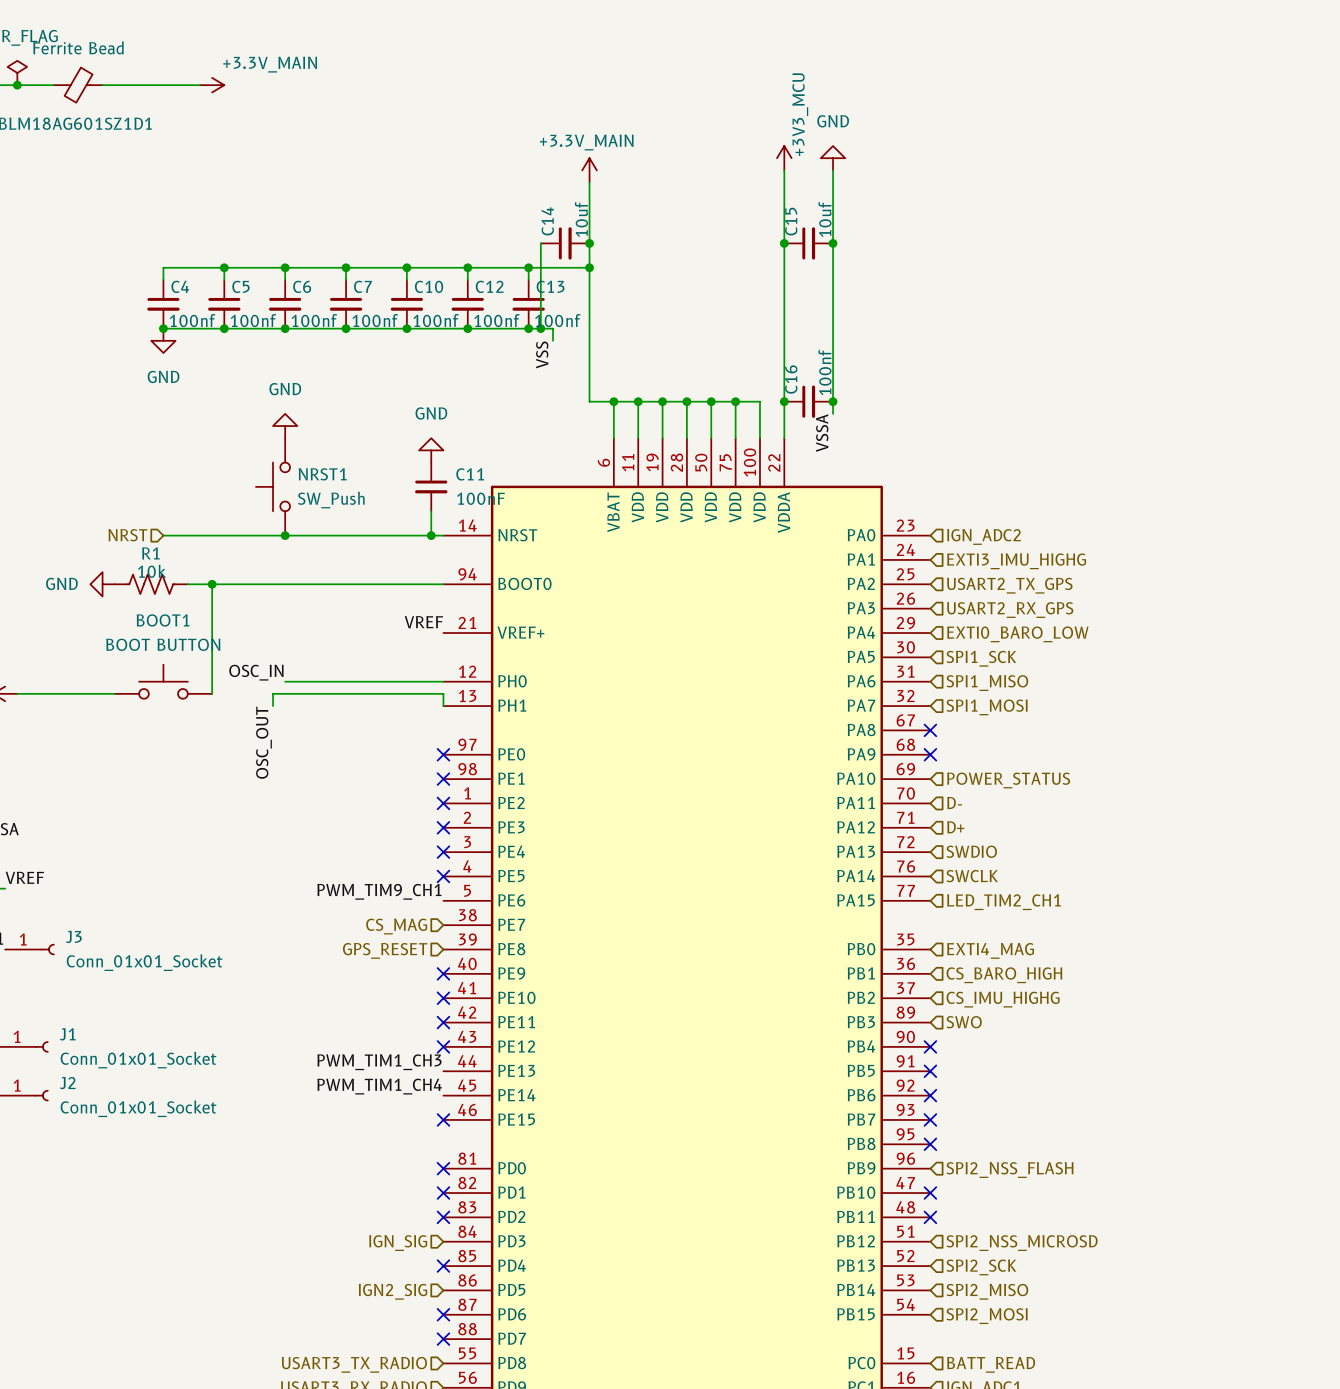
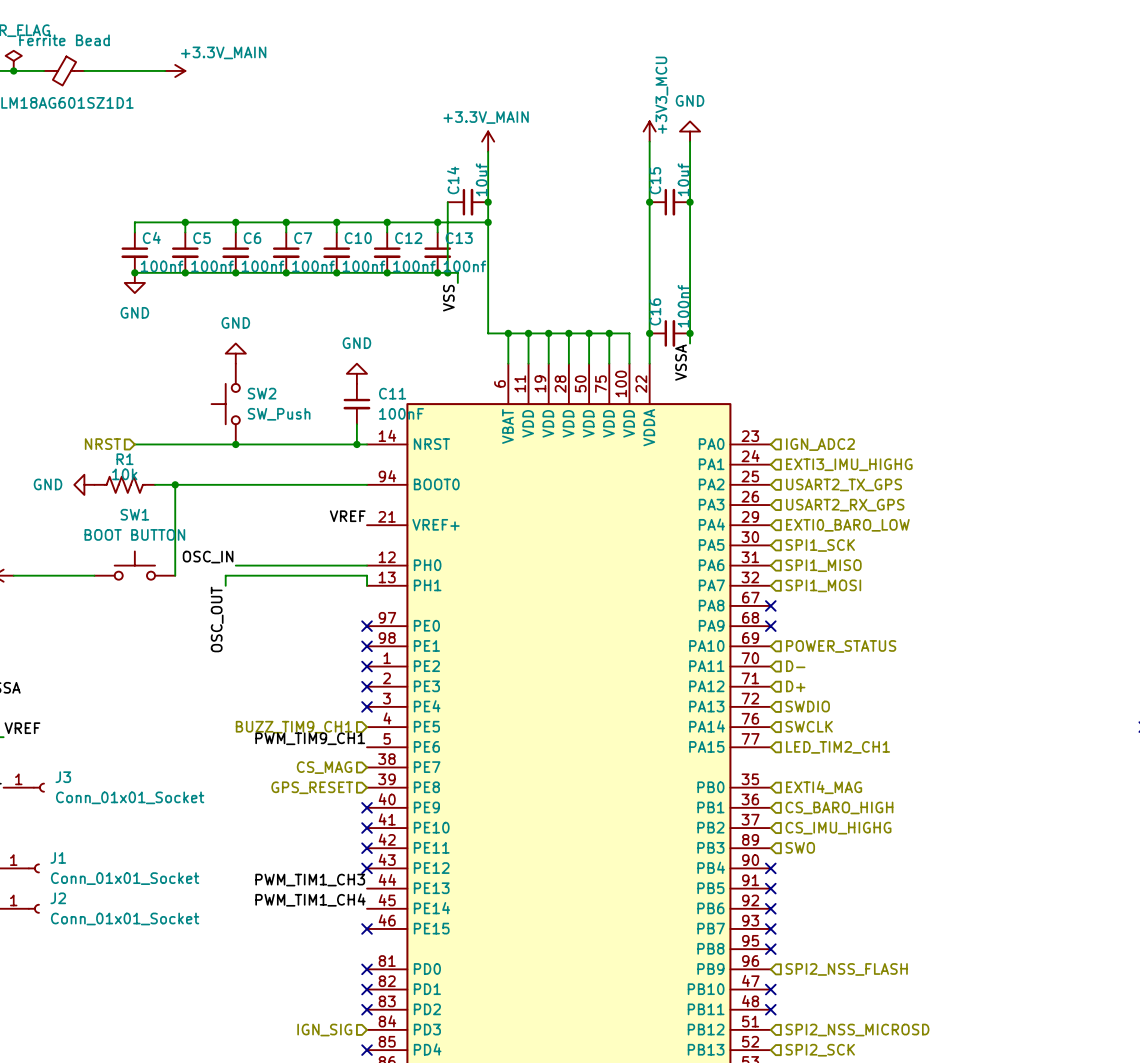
NRST1 name: NRST1 (322, 474) -> SW2 (262, 393)
BOOT1 name: BOOT1 (163, 620) -> SW1 (134, 514)
no-connect mark: (443, 876) -> none
hierarchical label: none -> BUZZ_TIM9_CH1 (294, 727)

